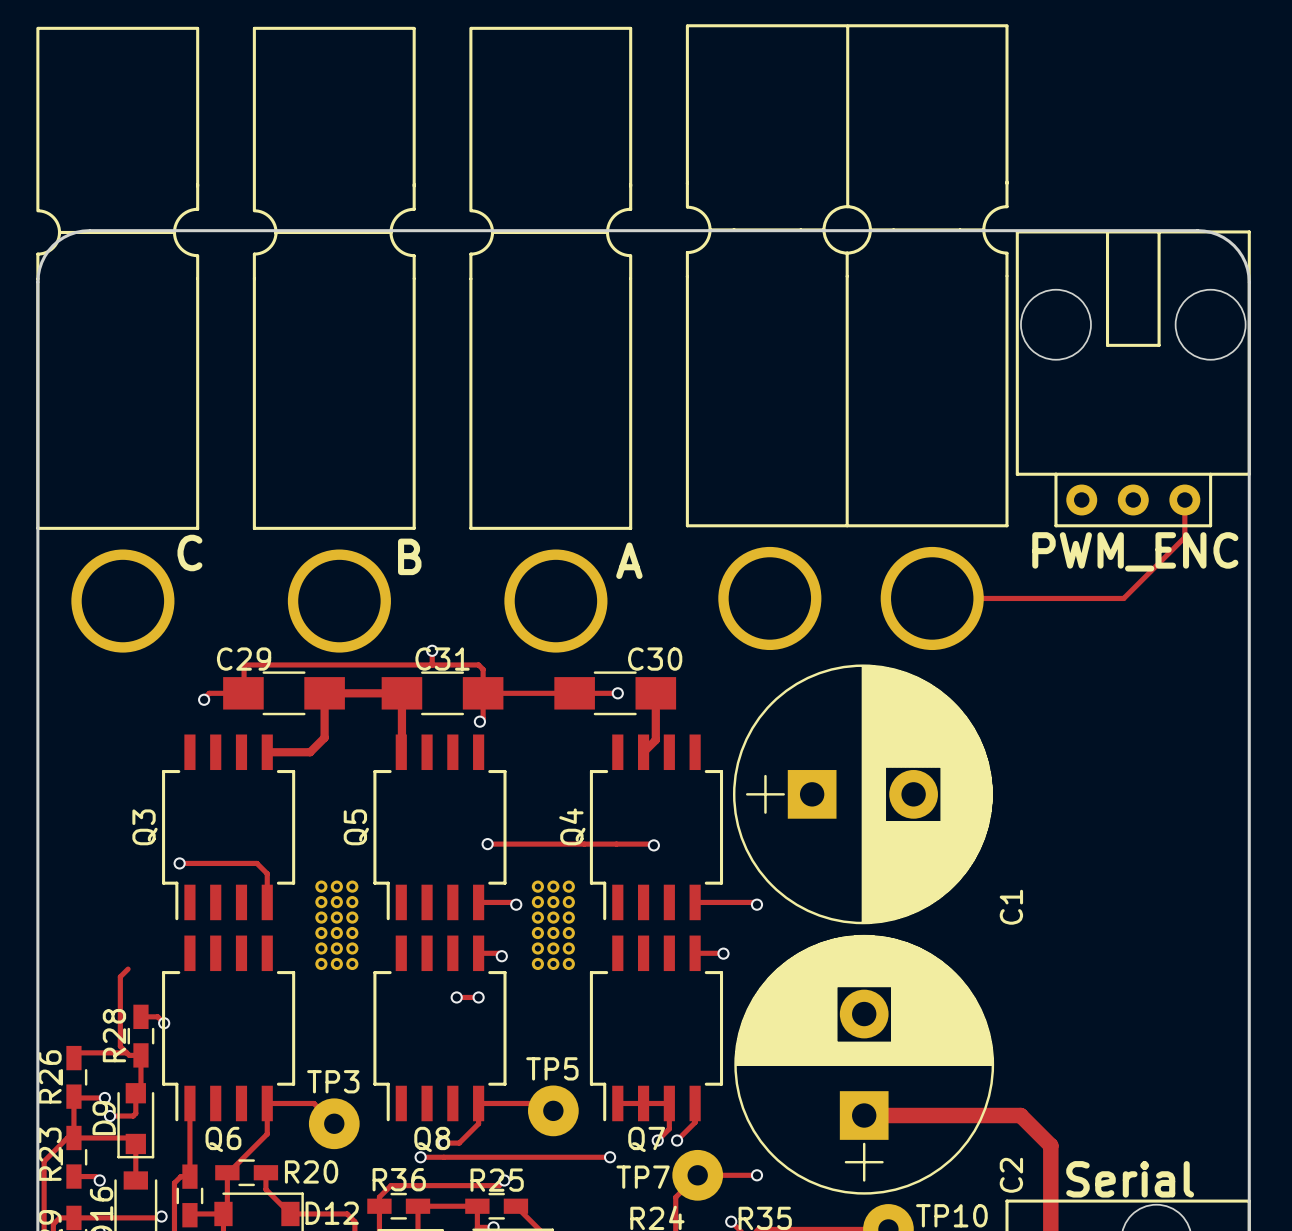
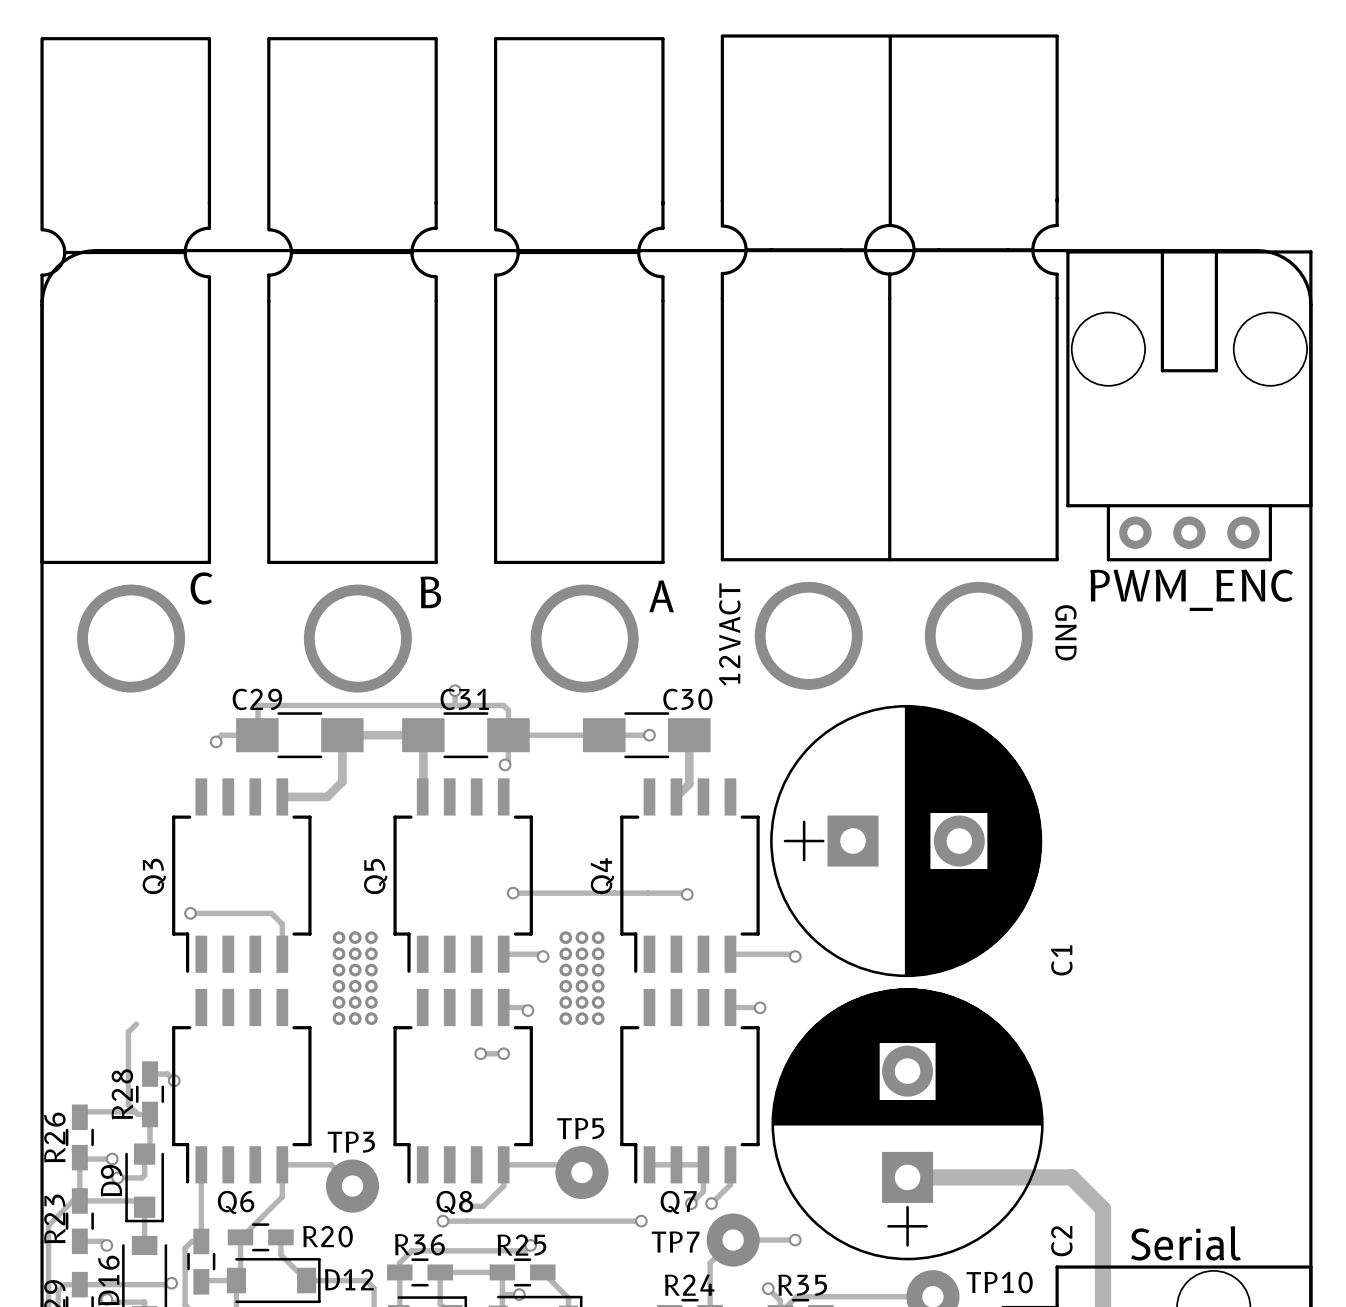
track: (1184, 500) (1184, 537) (1123, 598) (932, 598) -> none
text: none -> GND (1065, 632)
text: none -> 12VACT (729, 634)

